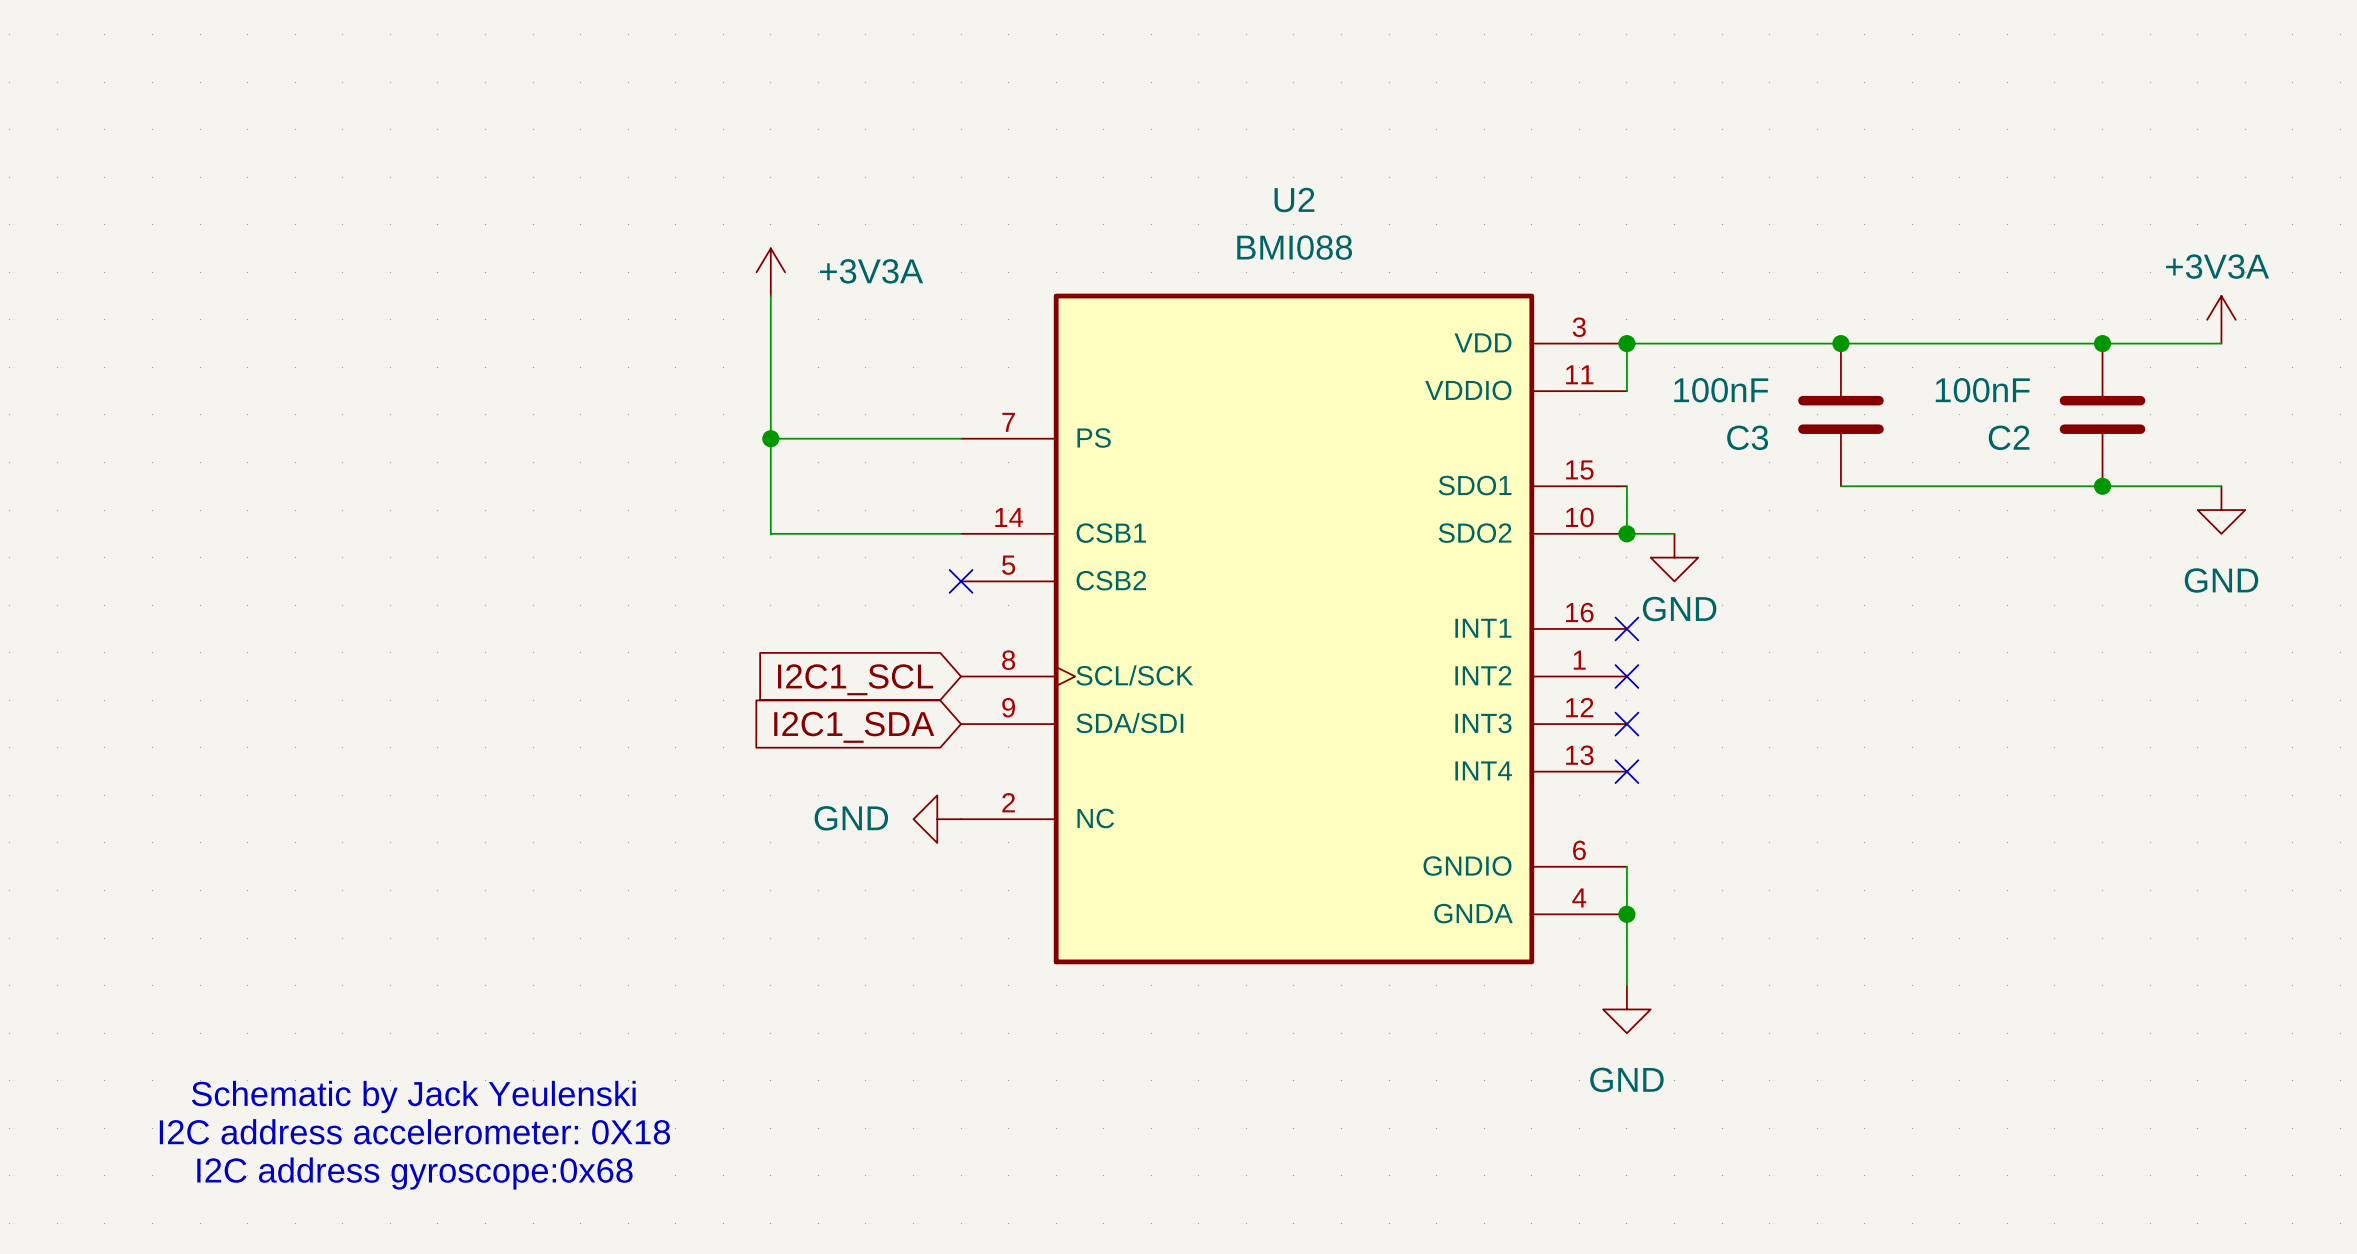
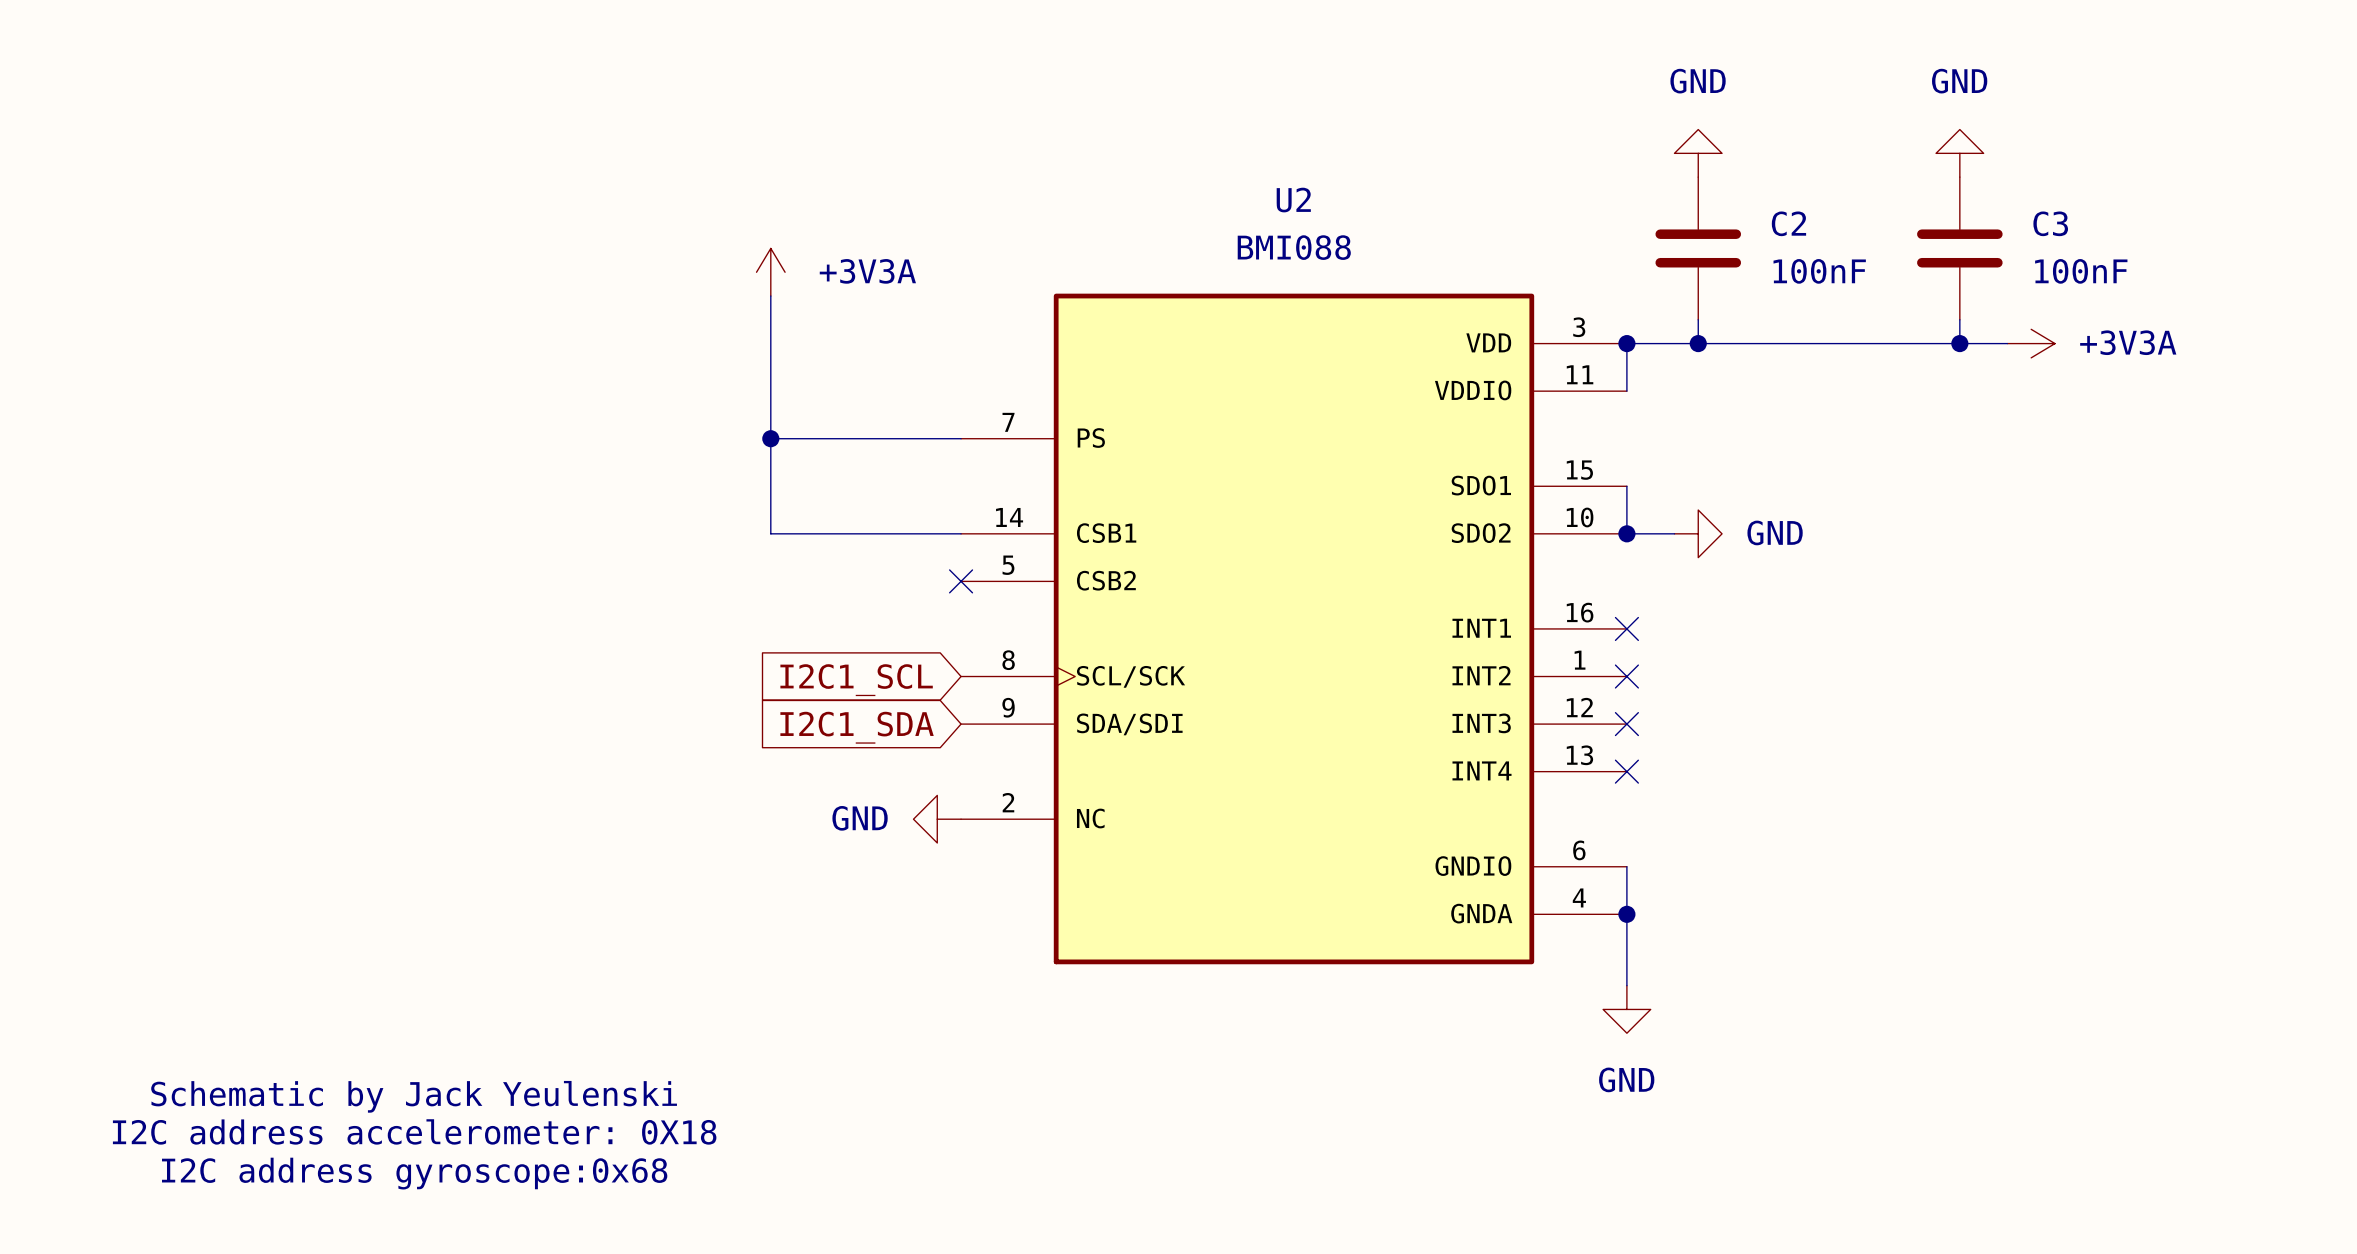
power symbol: none -> GND (1698, 153)
power symbol: none -> GND (1959, 153)
power symbol text position: +3V3A (2217, 266) -> +3V3A (2128, 342)
wire: none -> (1698, 319) (1698, 343)
wire: none -> (1959, 319) (1959, 343)
power symbol rotation: 0° (2221, 319) -> 90° clockwise (2031, 343)
power symbol position: +3V3A (2221, 319) -> +3V3A (2031, 343)
junction: none -> (1698, 343)
junction: (1840, 343) -> none
junction: none -> (1959, 343)
wire: (2007, 343) (2221, 343) -> none
junction: (2102, 343) -> none
C3 value position: 100nF (1721, 390) -> 100nF (2081, 271)
C2 value position: 100nF (1982, 390) -> 100nF (1819, 271)
C3 position: (1840, 414) -> (1959, 248)
C2 position: (2102, 414) -> (1698, 248)
C3 name position: C3 (1747, 437) -> C3 (2050, 223)
C2 name position: C2 (2009, 437) -> C2 (1788, 223)
wire: (1840, 486) (2221, 486) -> none
junction: (2102, 486) -> none
power symbol: GND (2221, 510) -> none
power symbol rotation: 0° (1674, 557) -> 90° counterclockwise (1698, 533)
power symbol position: GND (1674, 557) -> GND (1698, 533)
power symbol text position: GND (1679, 609) -> GND (1775, 532)

